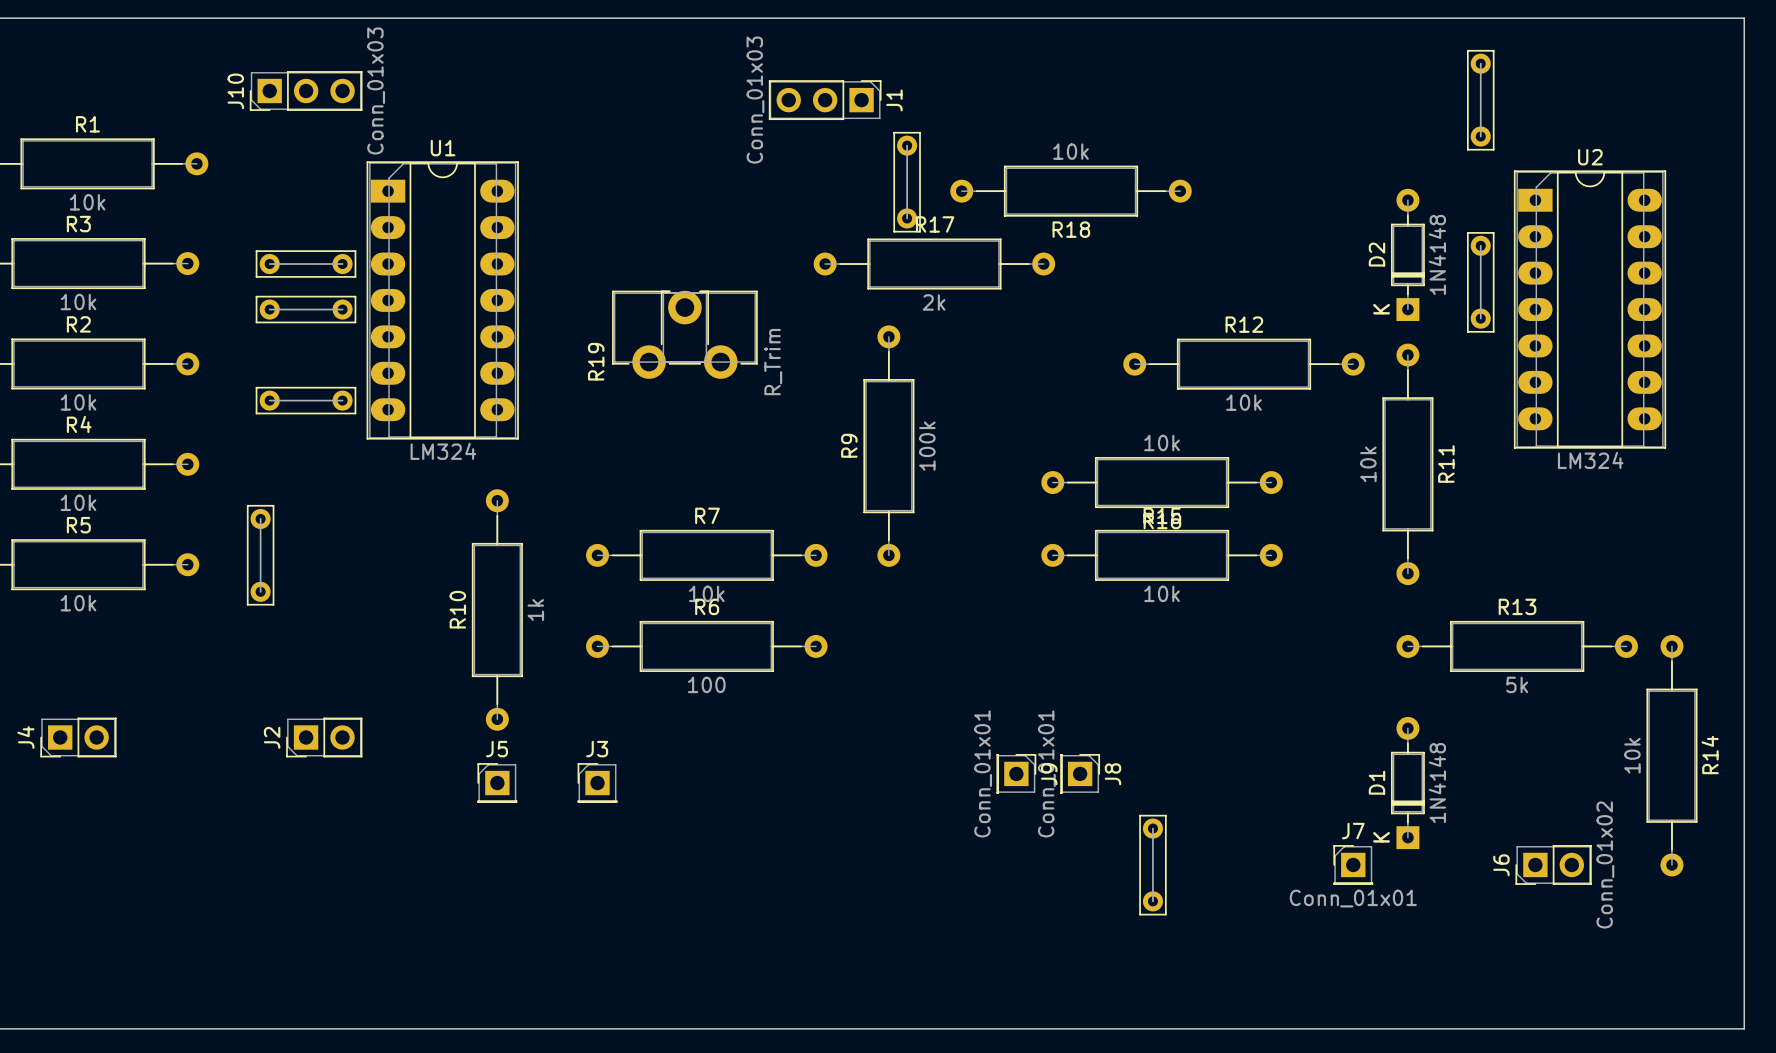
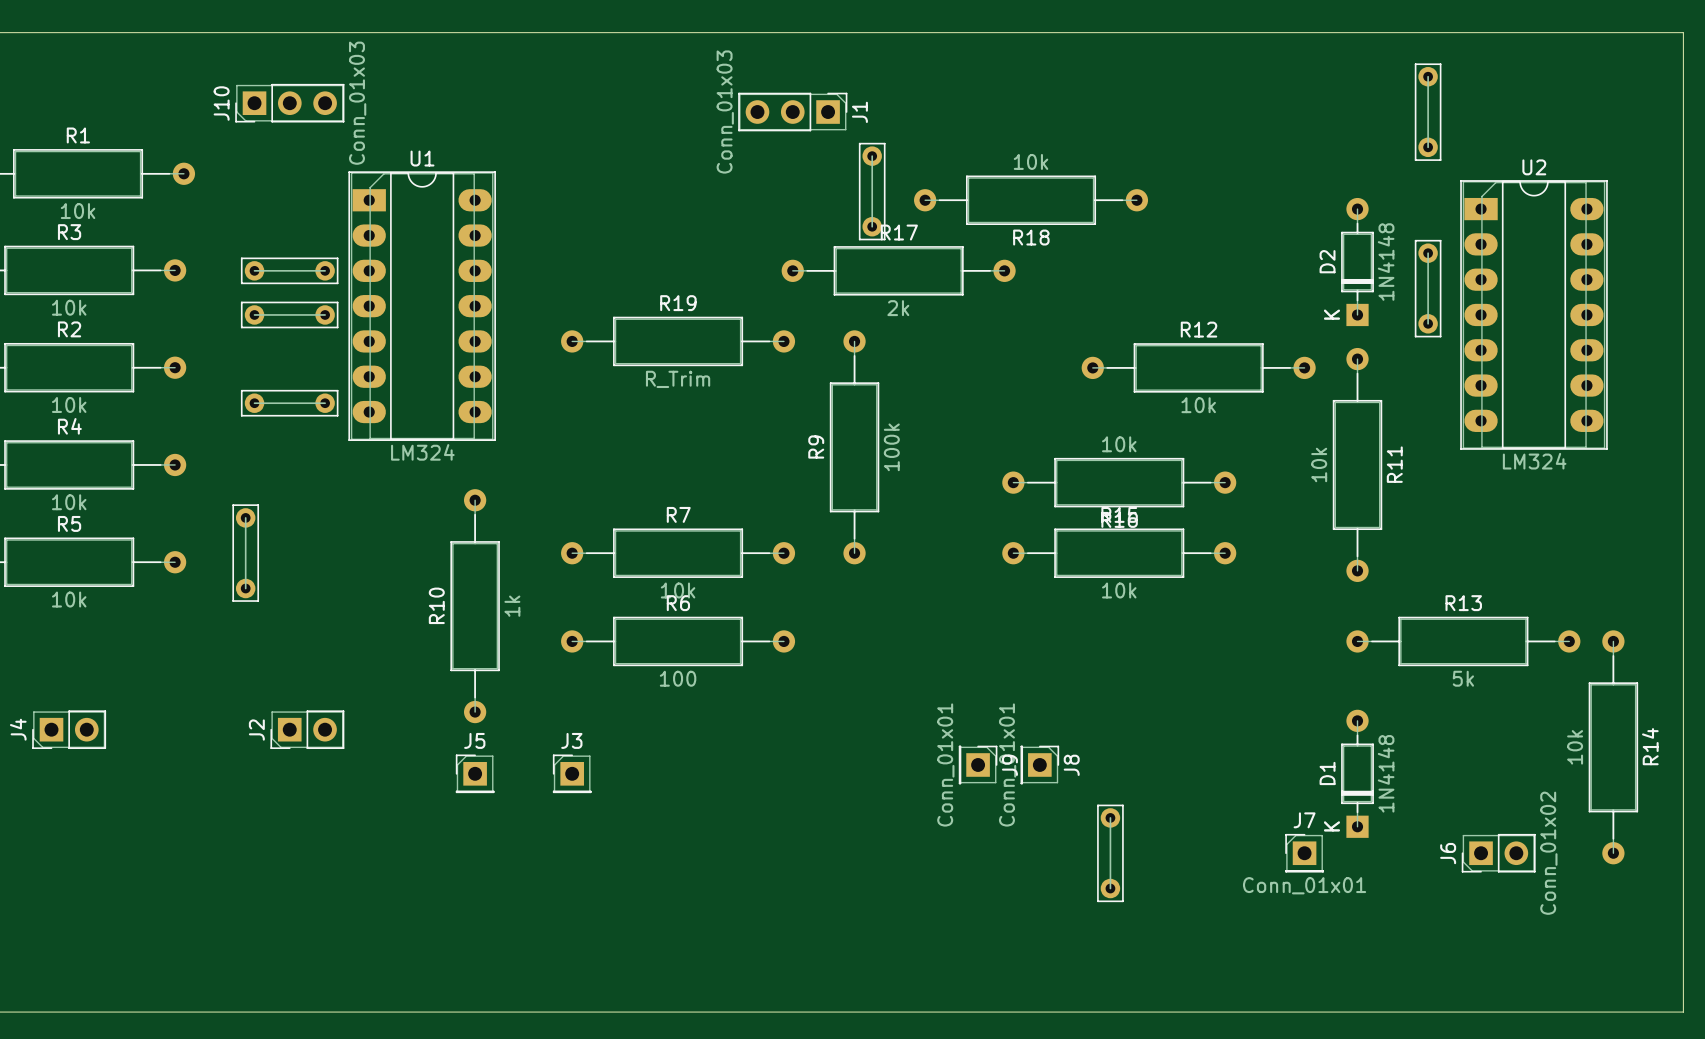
R19 footprint: [612, 290, 758, 379] -> [561, 316, 796, 367]
R19 name position: R19 (596, 361) -> R19 (678, 303)
R19 value position: R_Trim (773, 362) -> R_Trim (678, 379)

